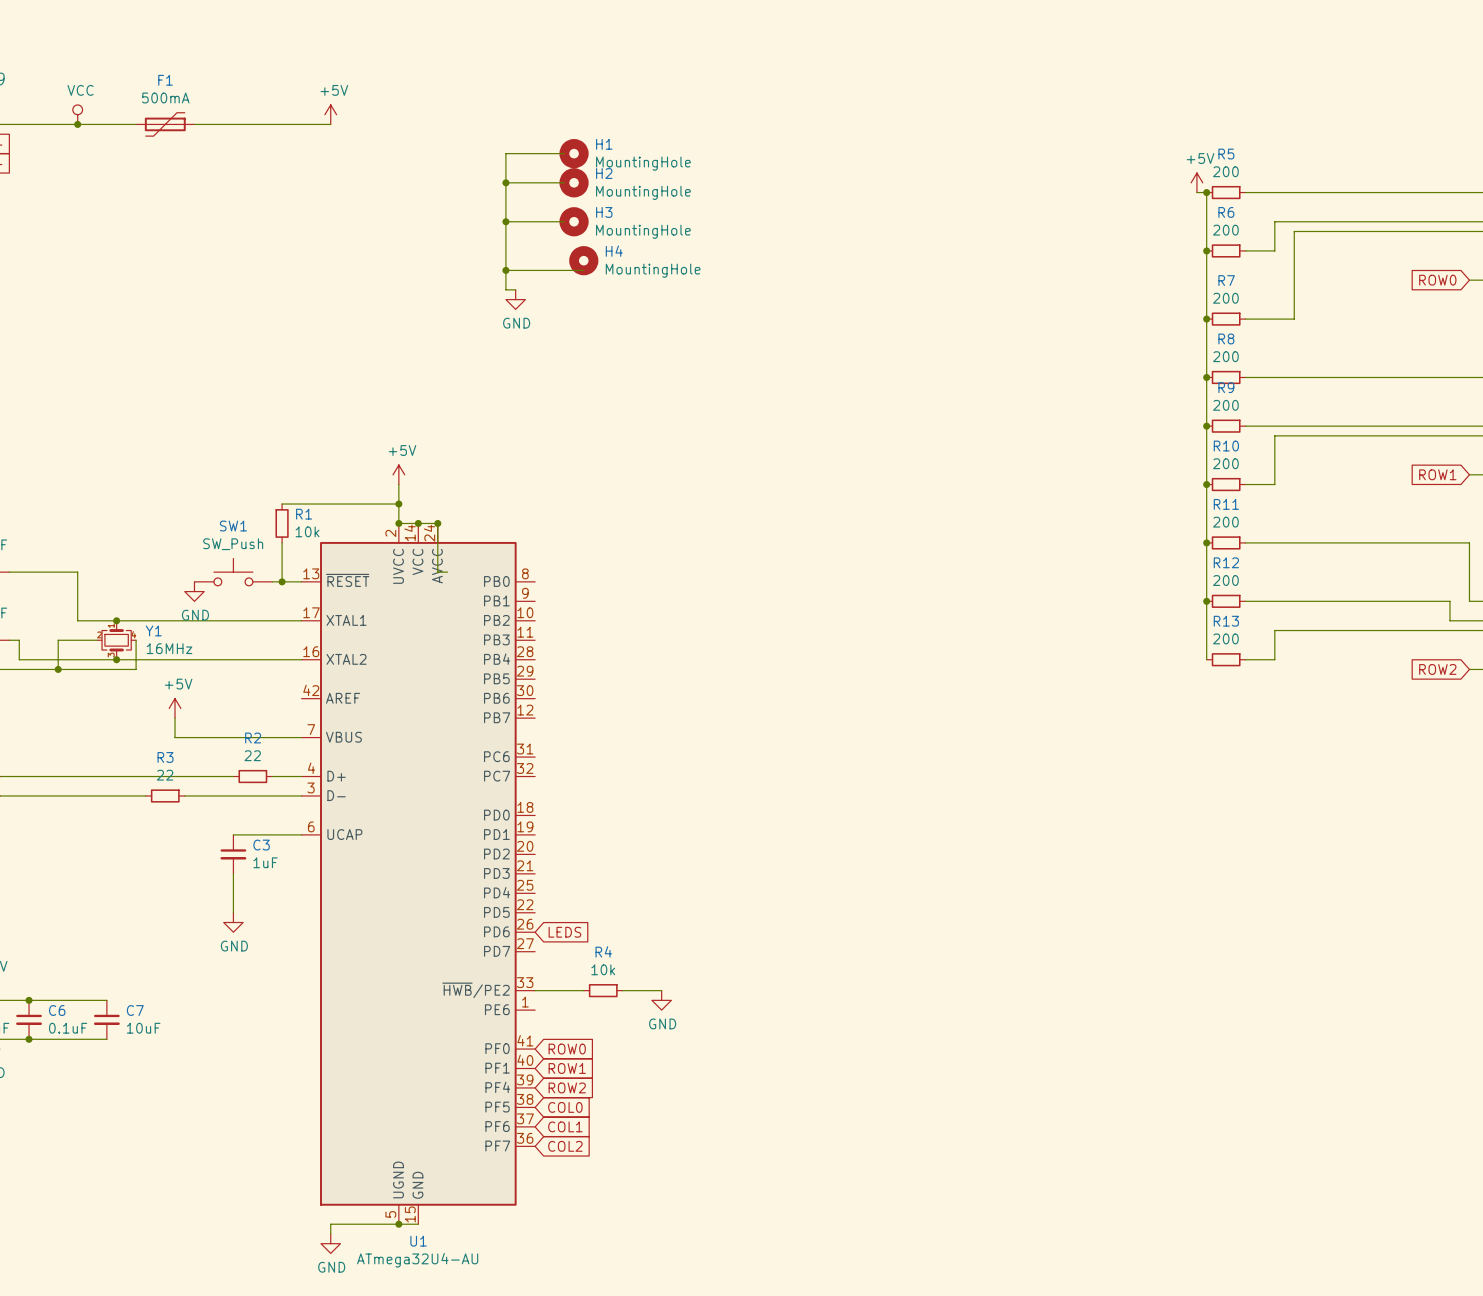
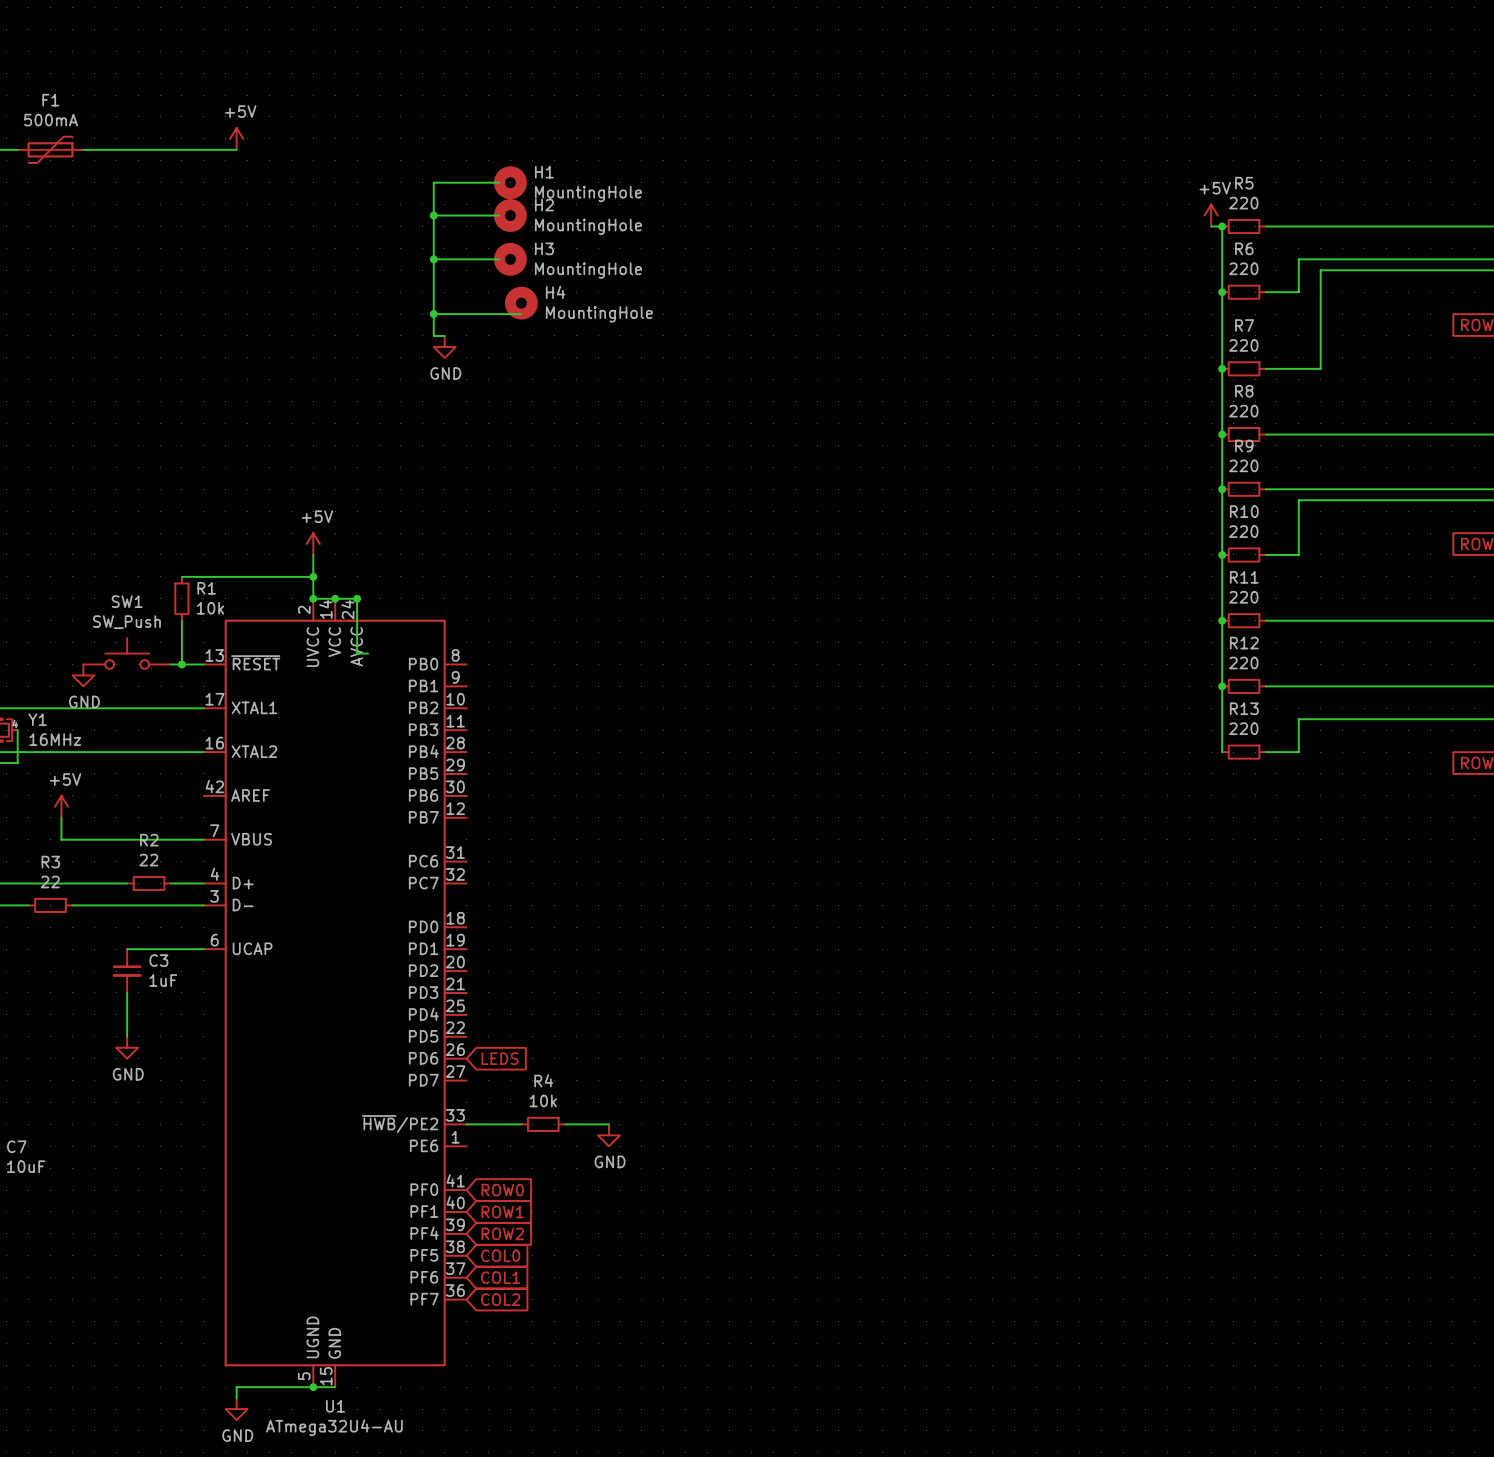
R5 value: 200 (1225, 171) -> 220 (1243, 203)
R6 value: 200 (1225, 230) -> 220 (1243, 268)
R7 value: 200 (1225, 298) -> 220 (1243, 345)
R8 value: 200 (1225, 356) -> 220 (1243, 411)
R9 value: 200 (1225, 405) -> 220 (1243, 465)
R10 value: 200 (1225, 463) -> 220 (1243, 531)
R11 value: 200 (1225, 522) -> 220 (1243, 597)
R12 value: 200 (1225, 580) -> 220 (1243, 662)
R13 value: 200 (1225, 638) -> 220 (1243, 728)

